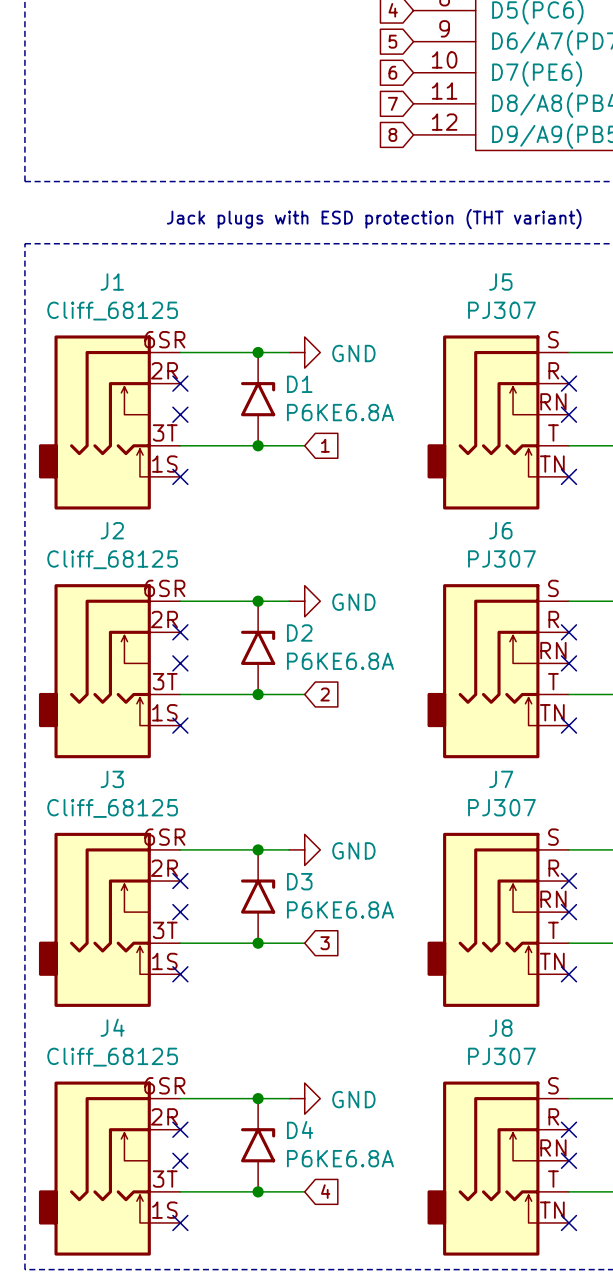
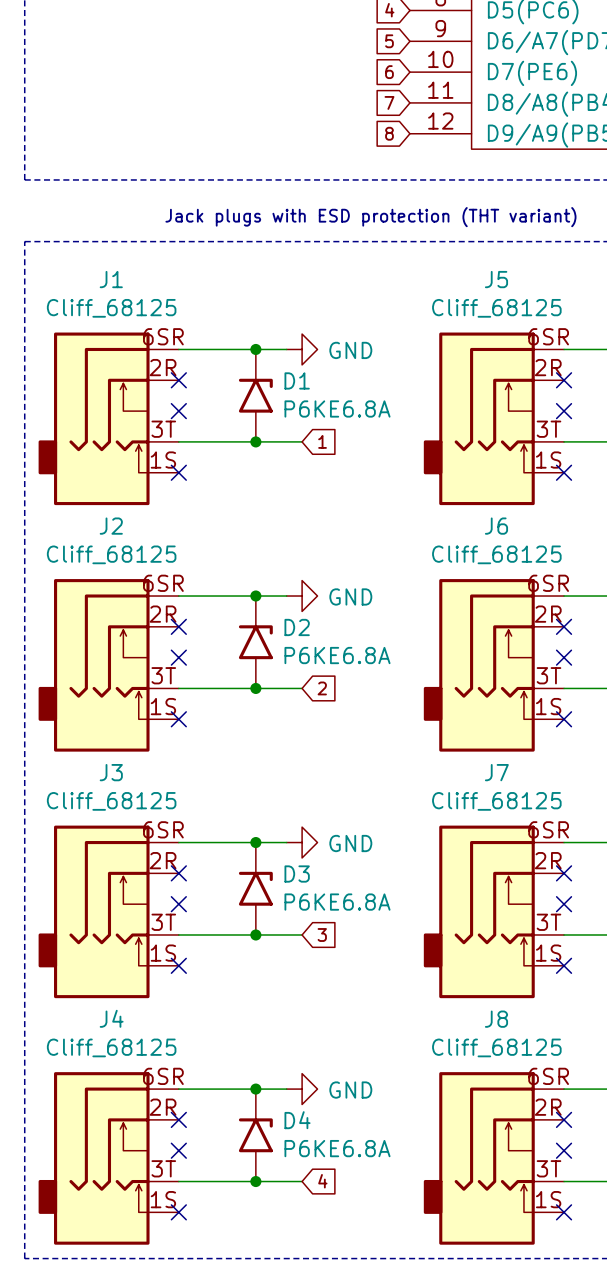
J5 value: PJ307 (501, 310) -> Cliff_68125 (496, 308)
J5 symbol: [427, 335, 569, 510] -> [423, 332, 565, 506]
J6 value: PJ307 (501, 558) -> Cliff_68125 (496, 554)
J6 symbol: [427, 584, 569, 759] -> [423, 579, 565, 752]
J7 value: PJ307 (501, 807) -> Cliff_68125 (496, 801)
J7 symbol: [427, 832, 569, 1007] -> [423, 825, 565, 999]
J8 value: PJ307 (501, 1056) -> Cliff_68125 (496, 1047)
J8 symbol: [427, 1081, 569, 1256] -> [423, 1072, 565, 1245]

